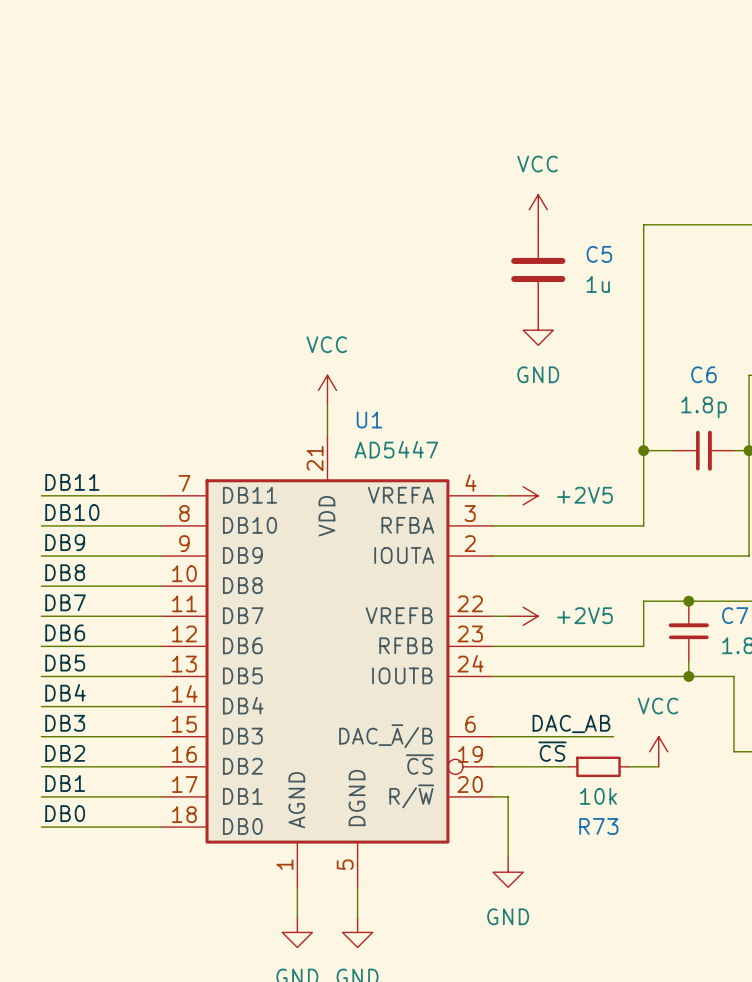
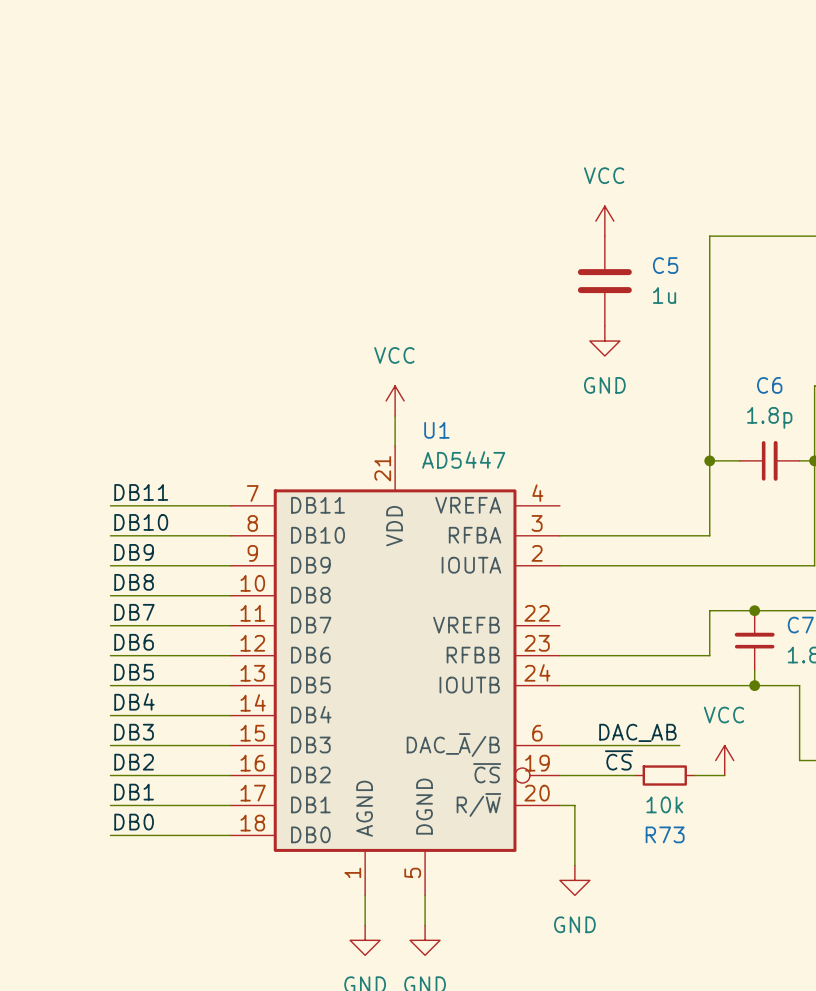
wire: (493, 495) (508, 495) -> none
power symbol: +2V5 (523, 495) -> none
wire: (493, 616) (508, 616) -> none
power symbol: +2V5 (523, 616) -> none

